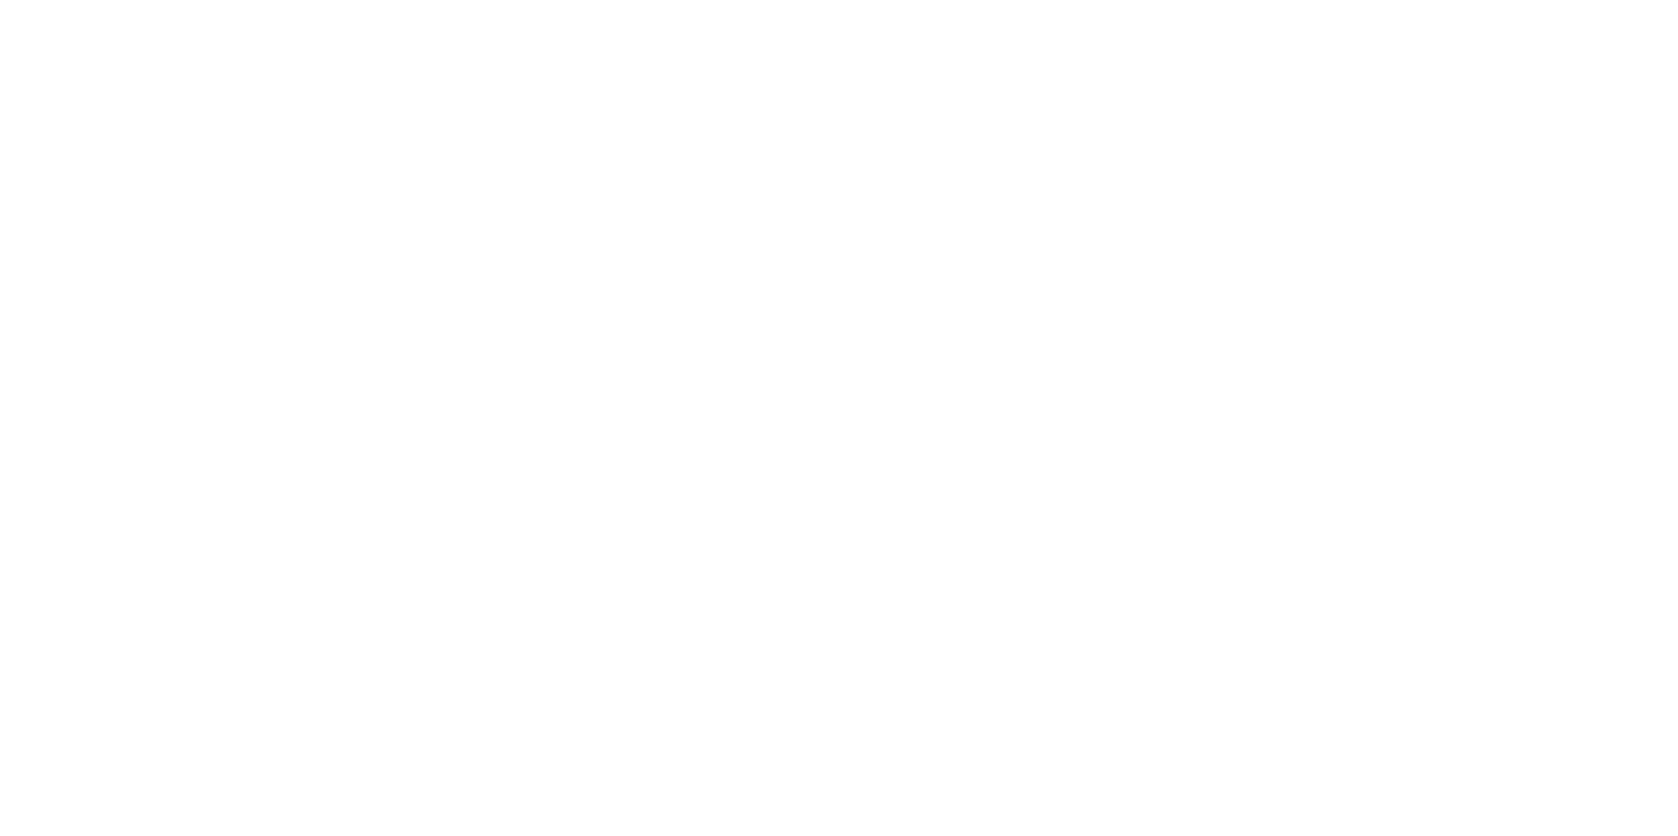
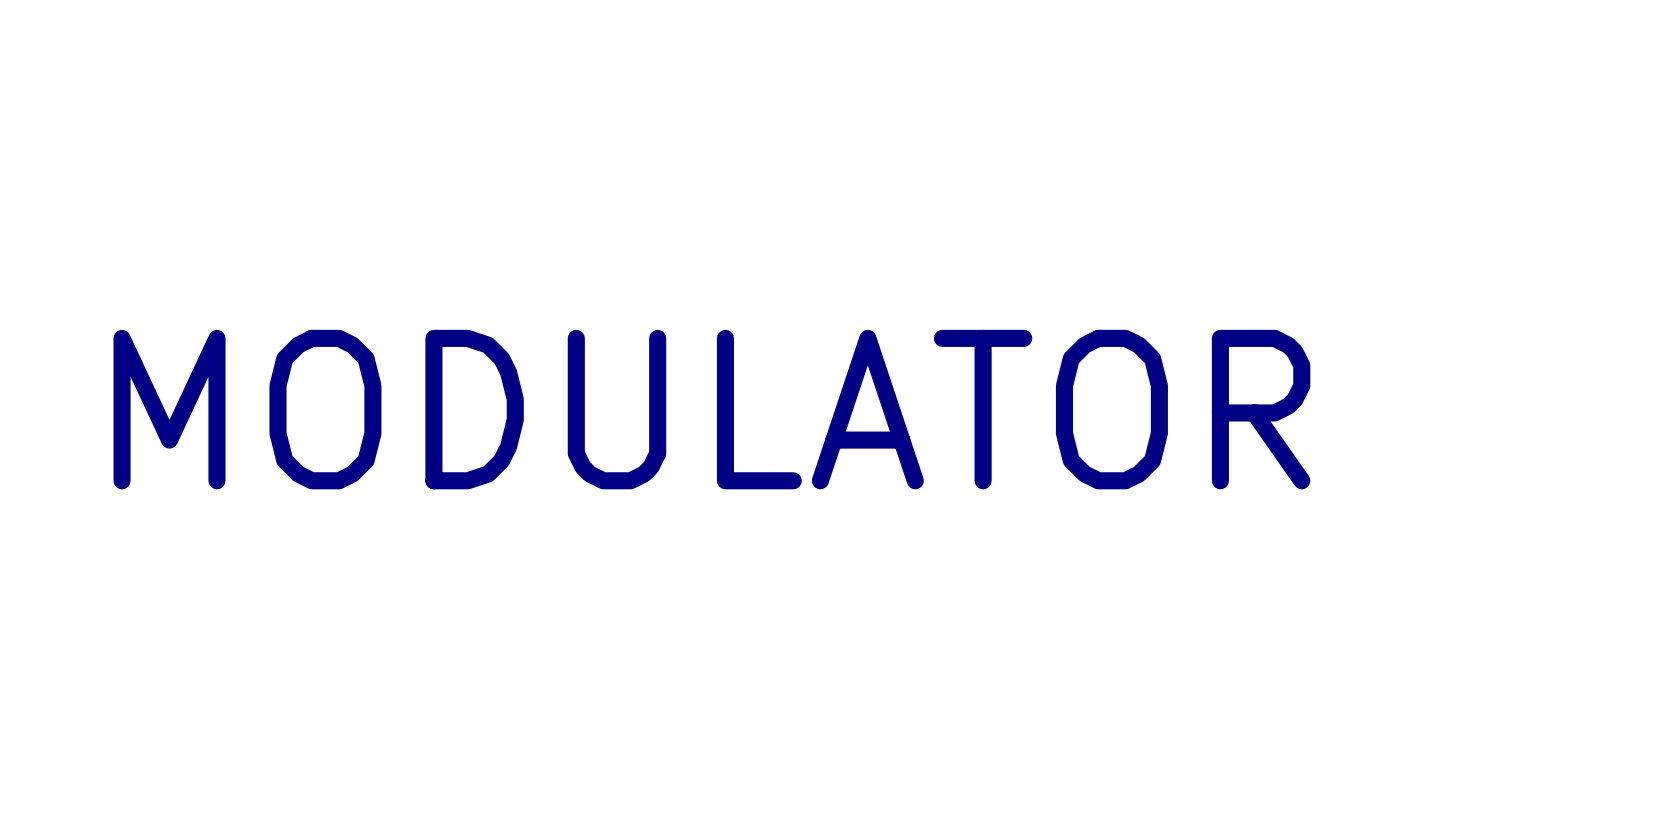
text: none -> MODULATOR (711, 409)

